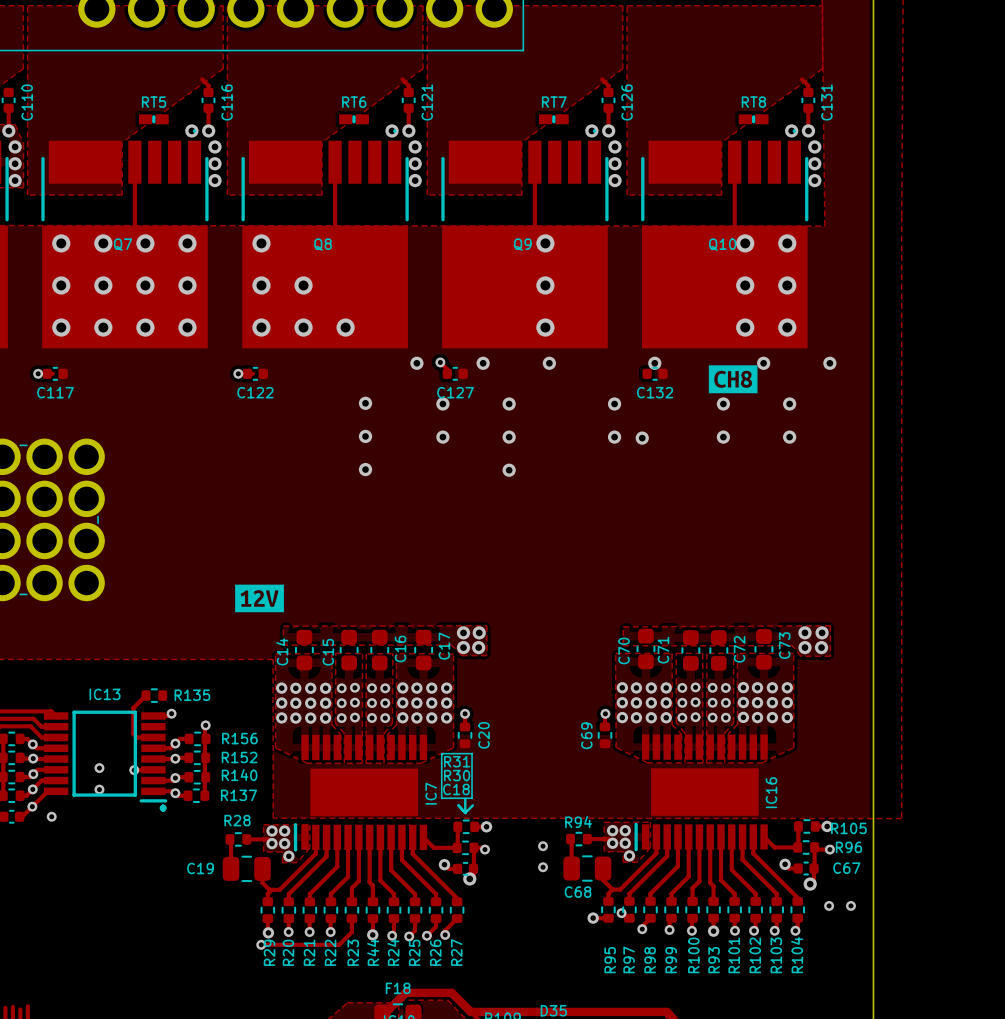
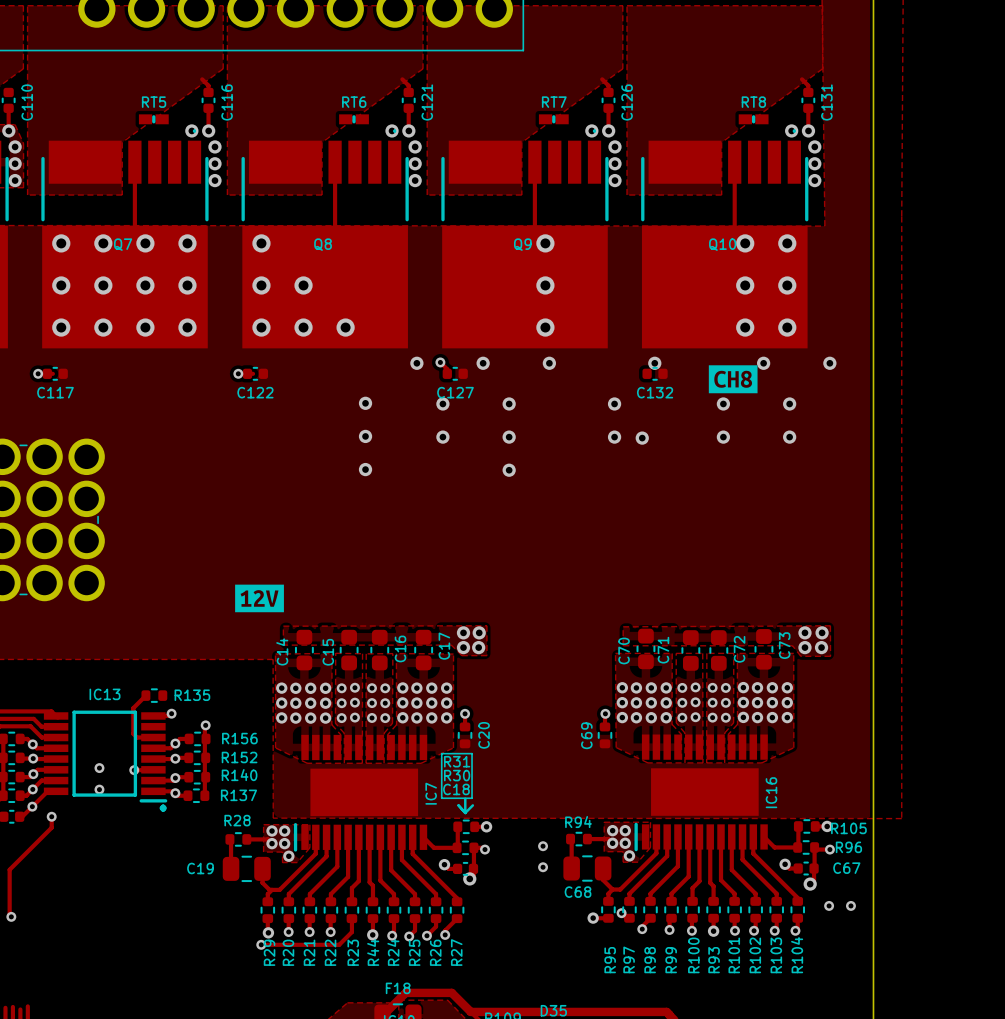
track: none -> (51, 816) (51, 827) (9, 869) (9, 915) (11, 916)
via: none -> (11, 916)

